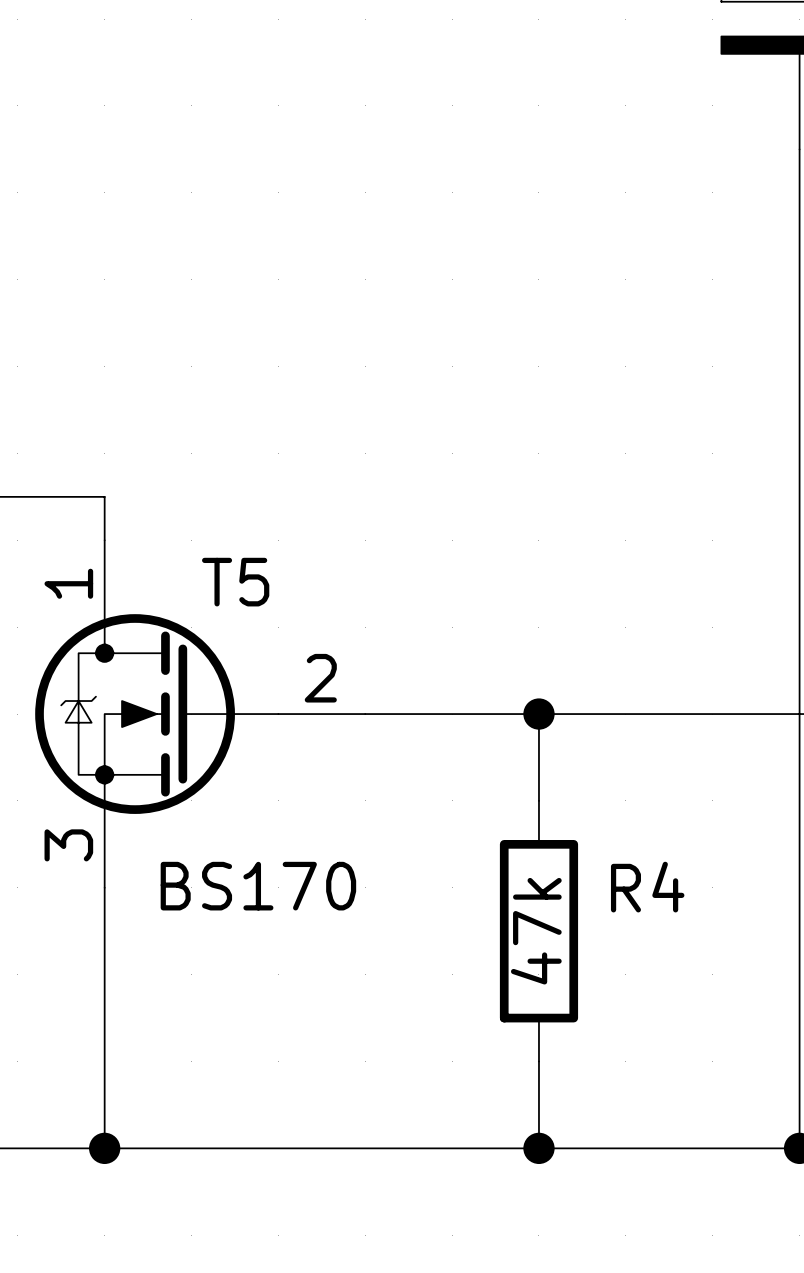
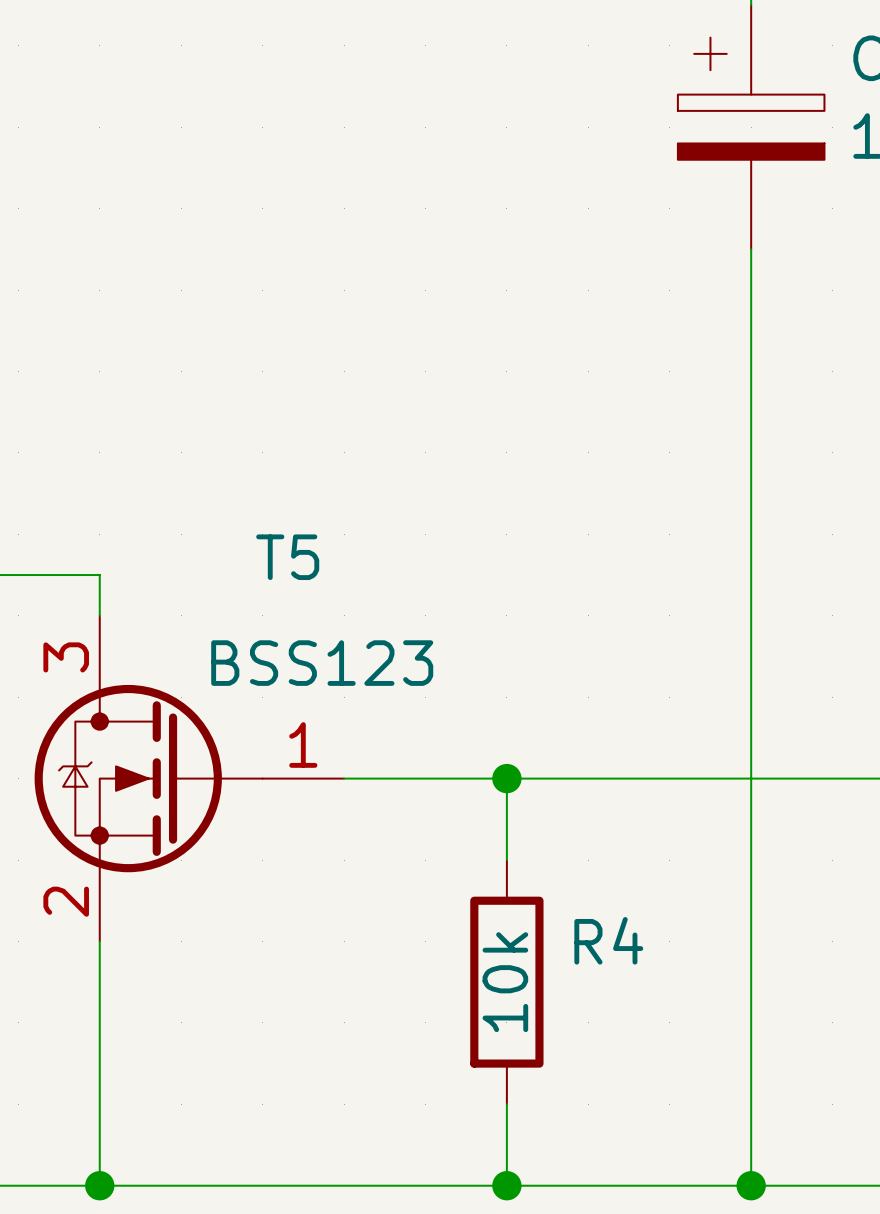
T5 name position: T5 (235, 582) -> T5 (287, 557)
T5 pin number: 1 (68, 583) -> 3 (66, 657)
T5 pin number: 2 (320, 678) -> 1 (303, 745)
T5 pin number: 3 (68, 845) -> 2 (66, 901)
T5 value: BS170 (258, 886) -> BSS123 (322, 663)
R4 value: 47k (536, 931) -> 10k (505, 982)

